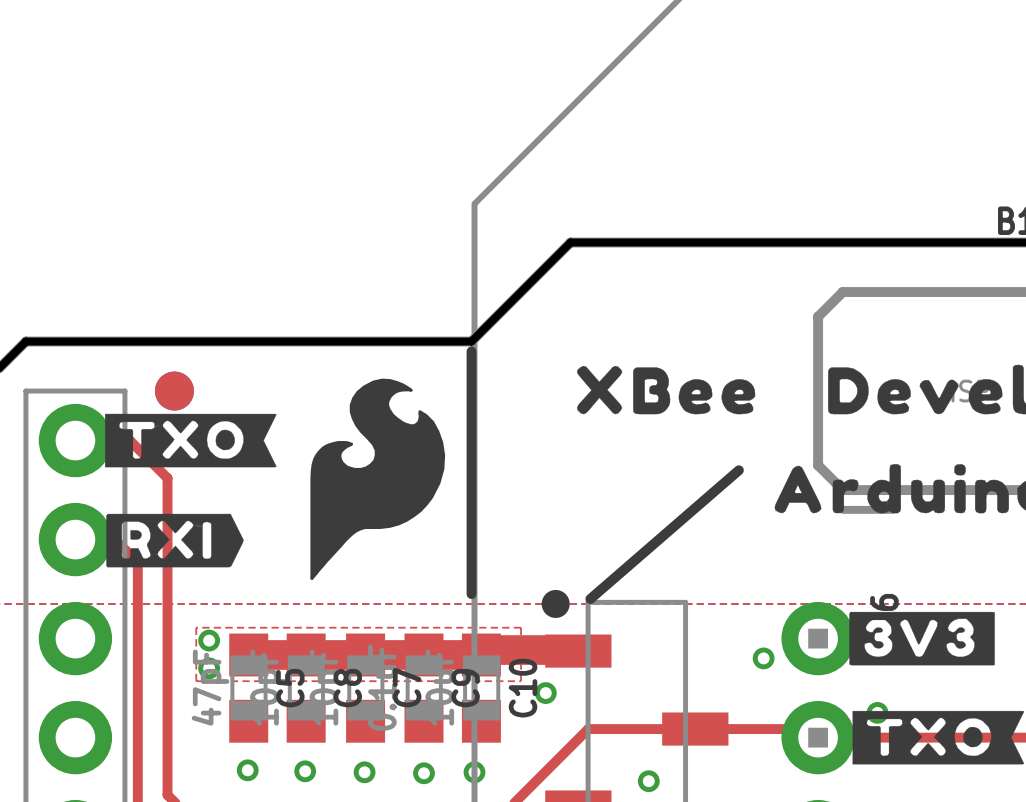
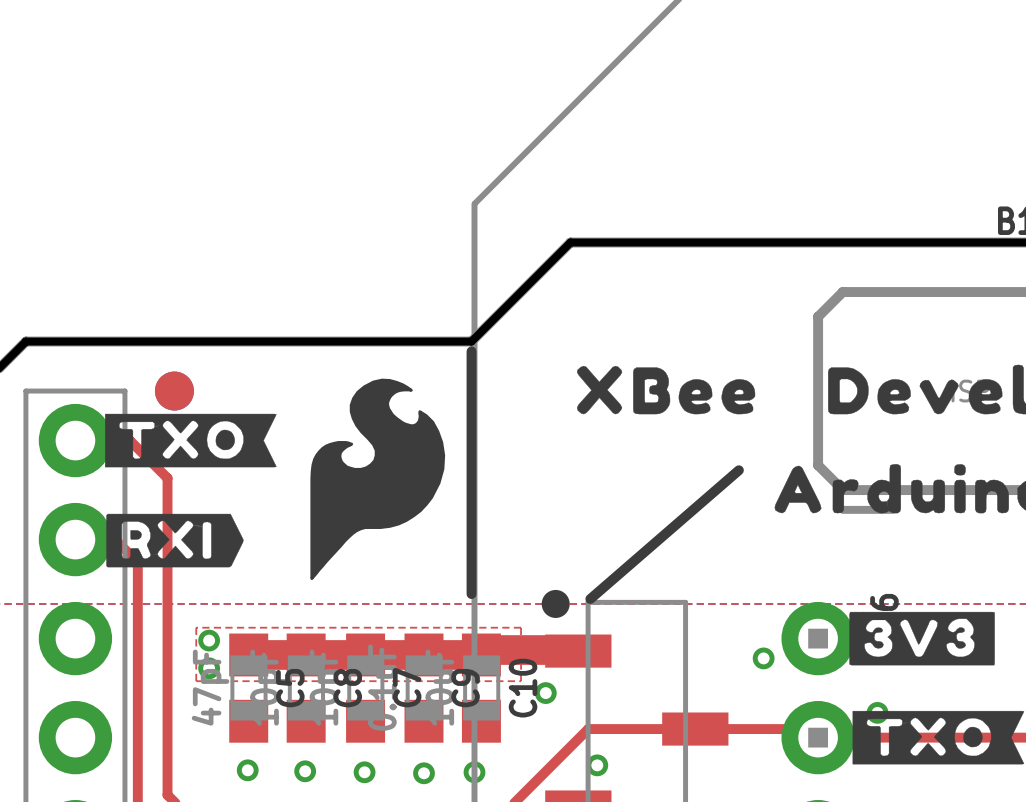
via position: (648, 781) -> (597, 765)

